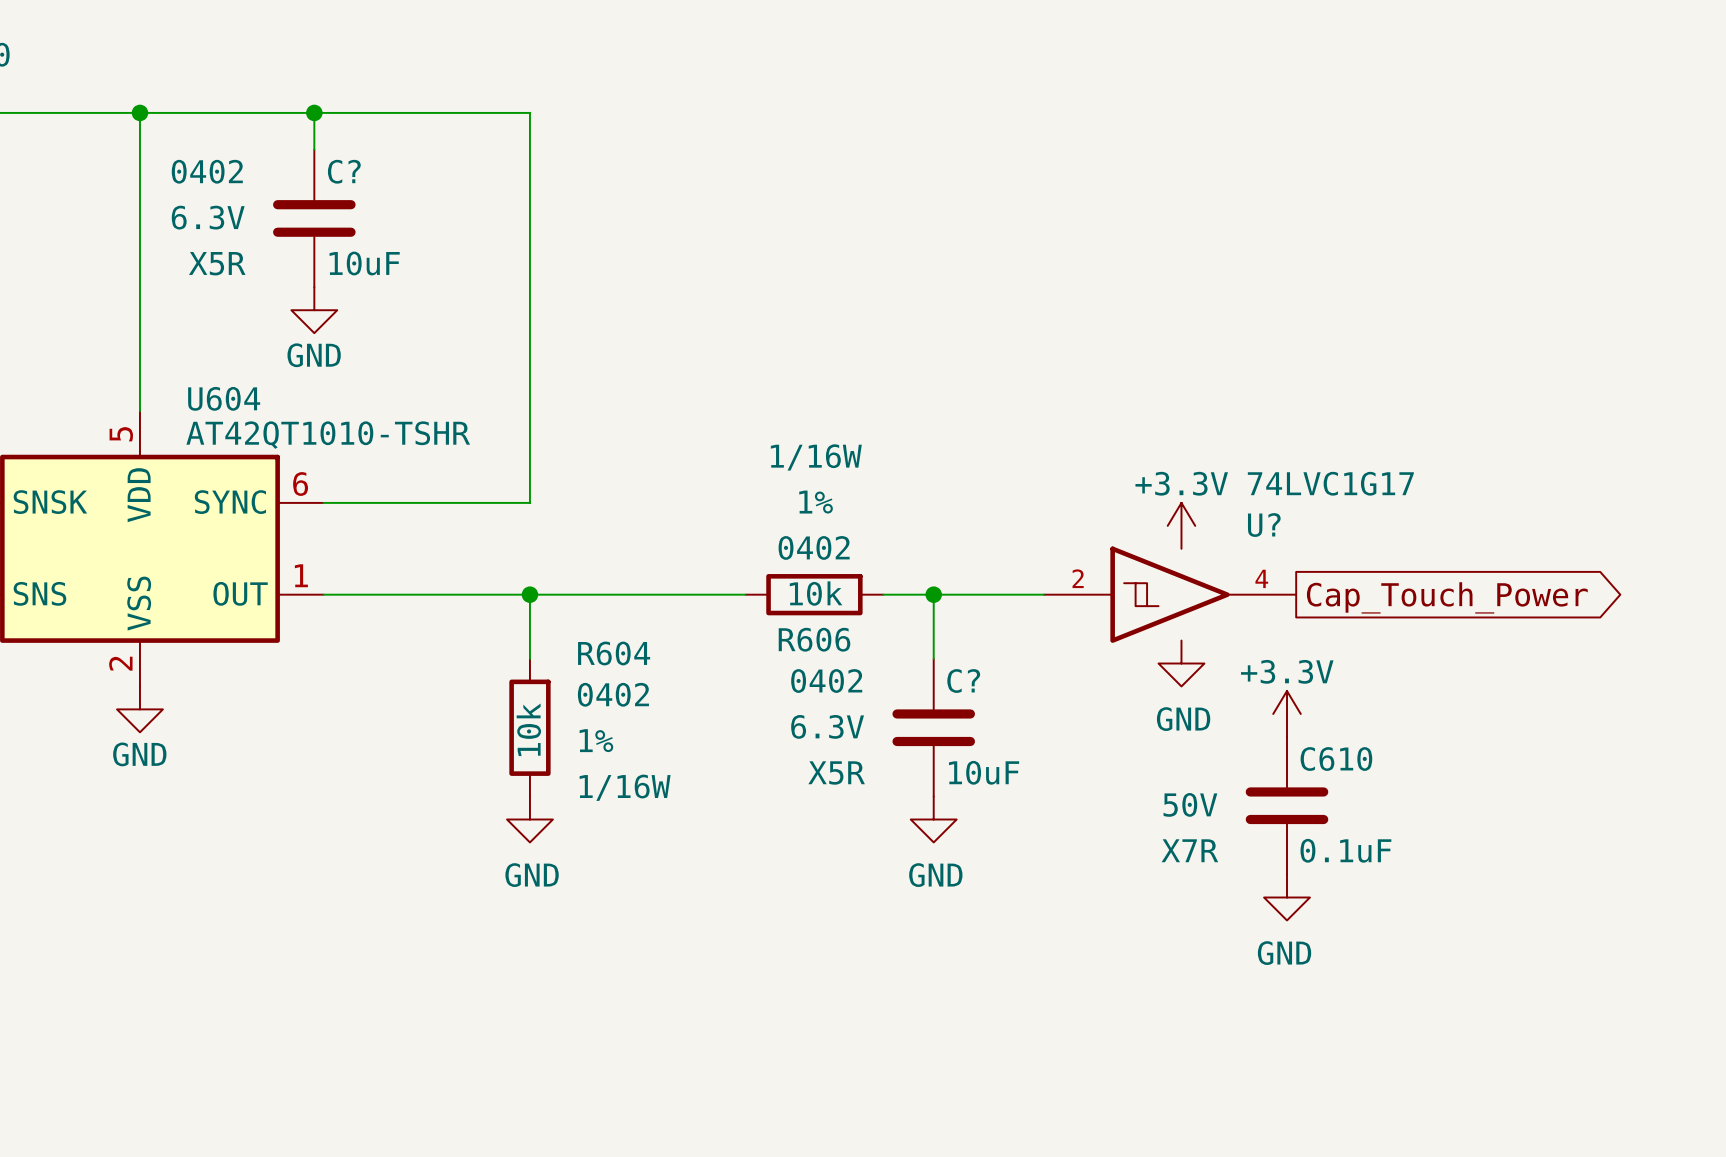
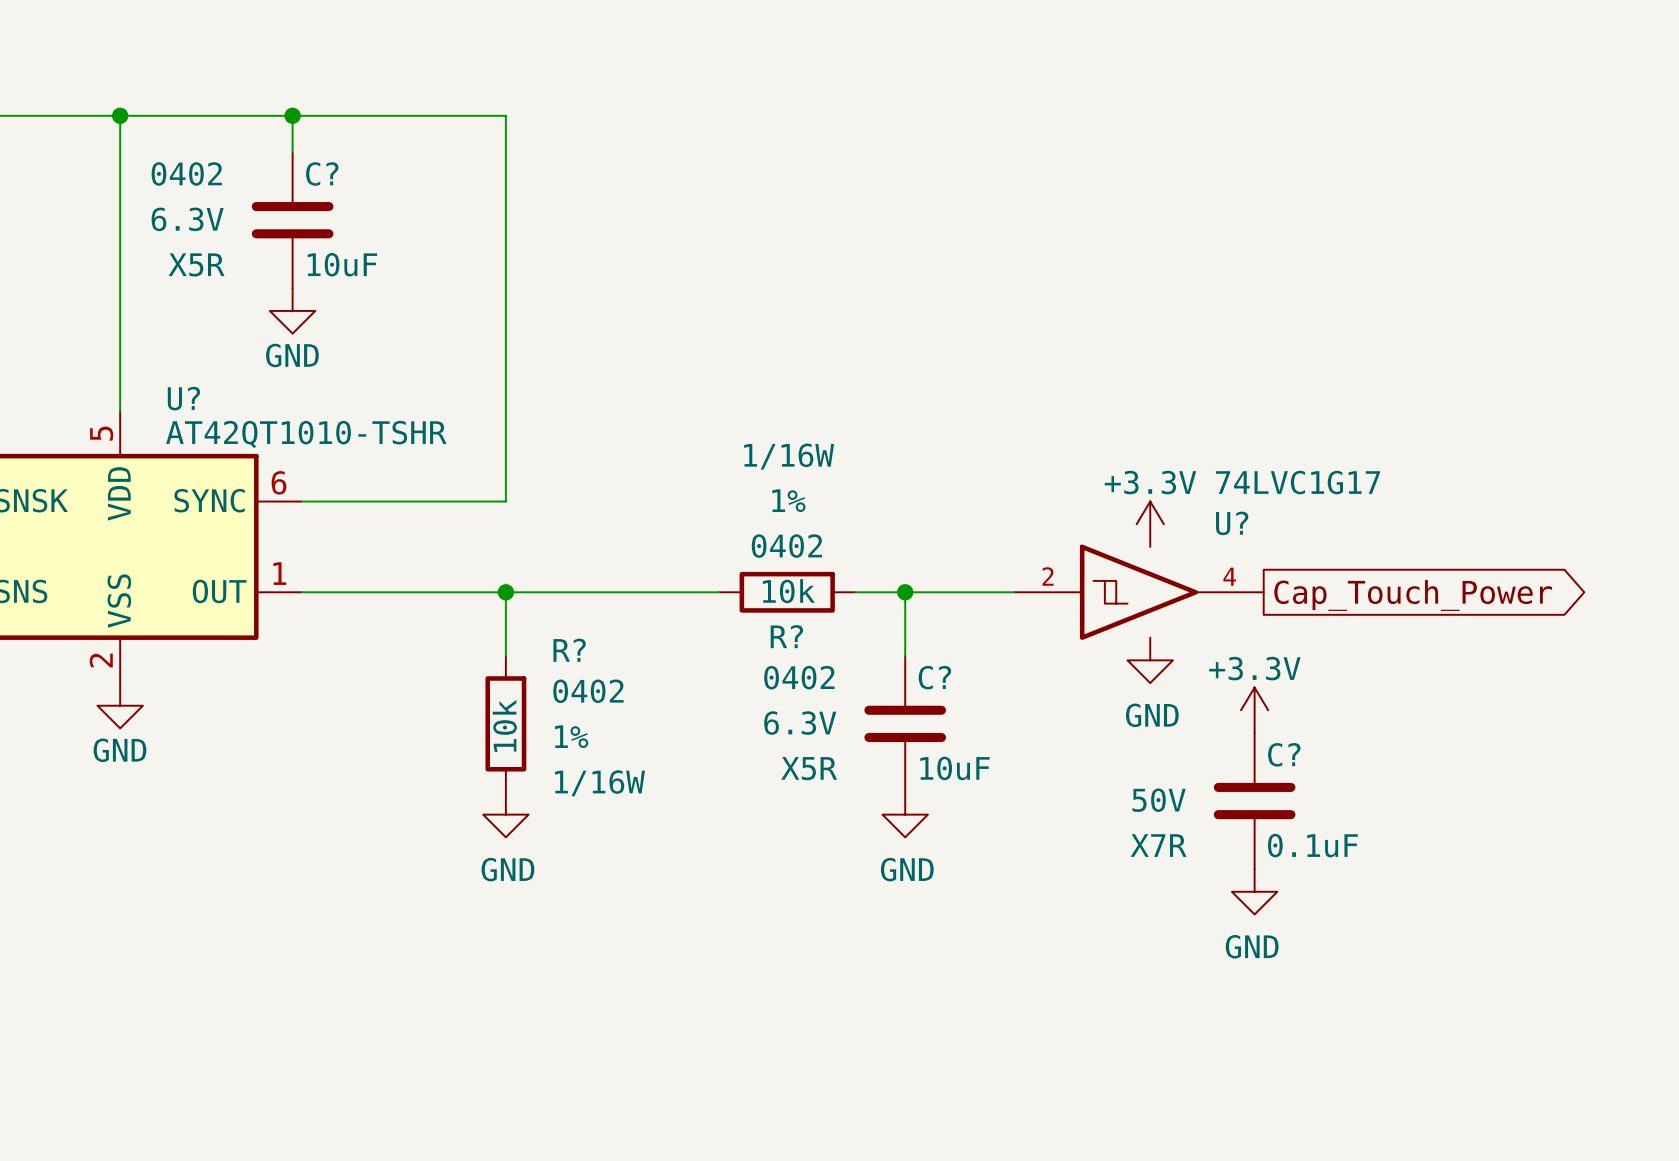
U604 name: U604 (224, 398) -> U? (183, 398)
R606 name: R606 (814, 639) -> R? (786, 636)
R604 name: R604 (614, 653) -> R? (569, 650)
C610 name: C610 (1336, 759) -> C? (1284, 754)

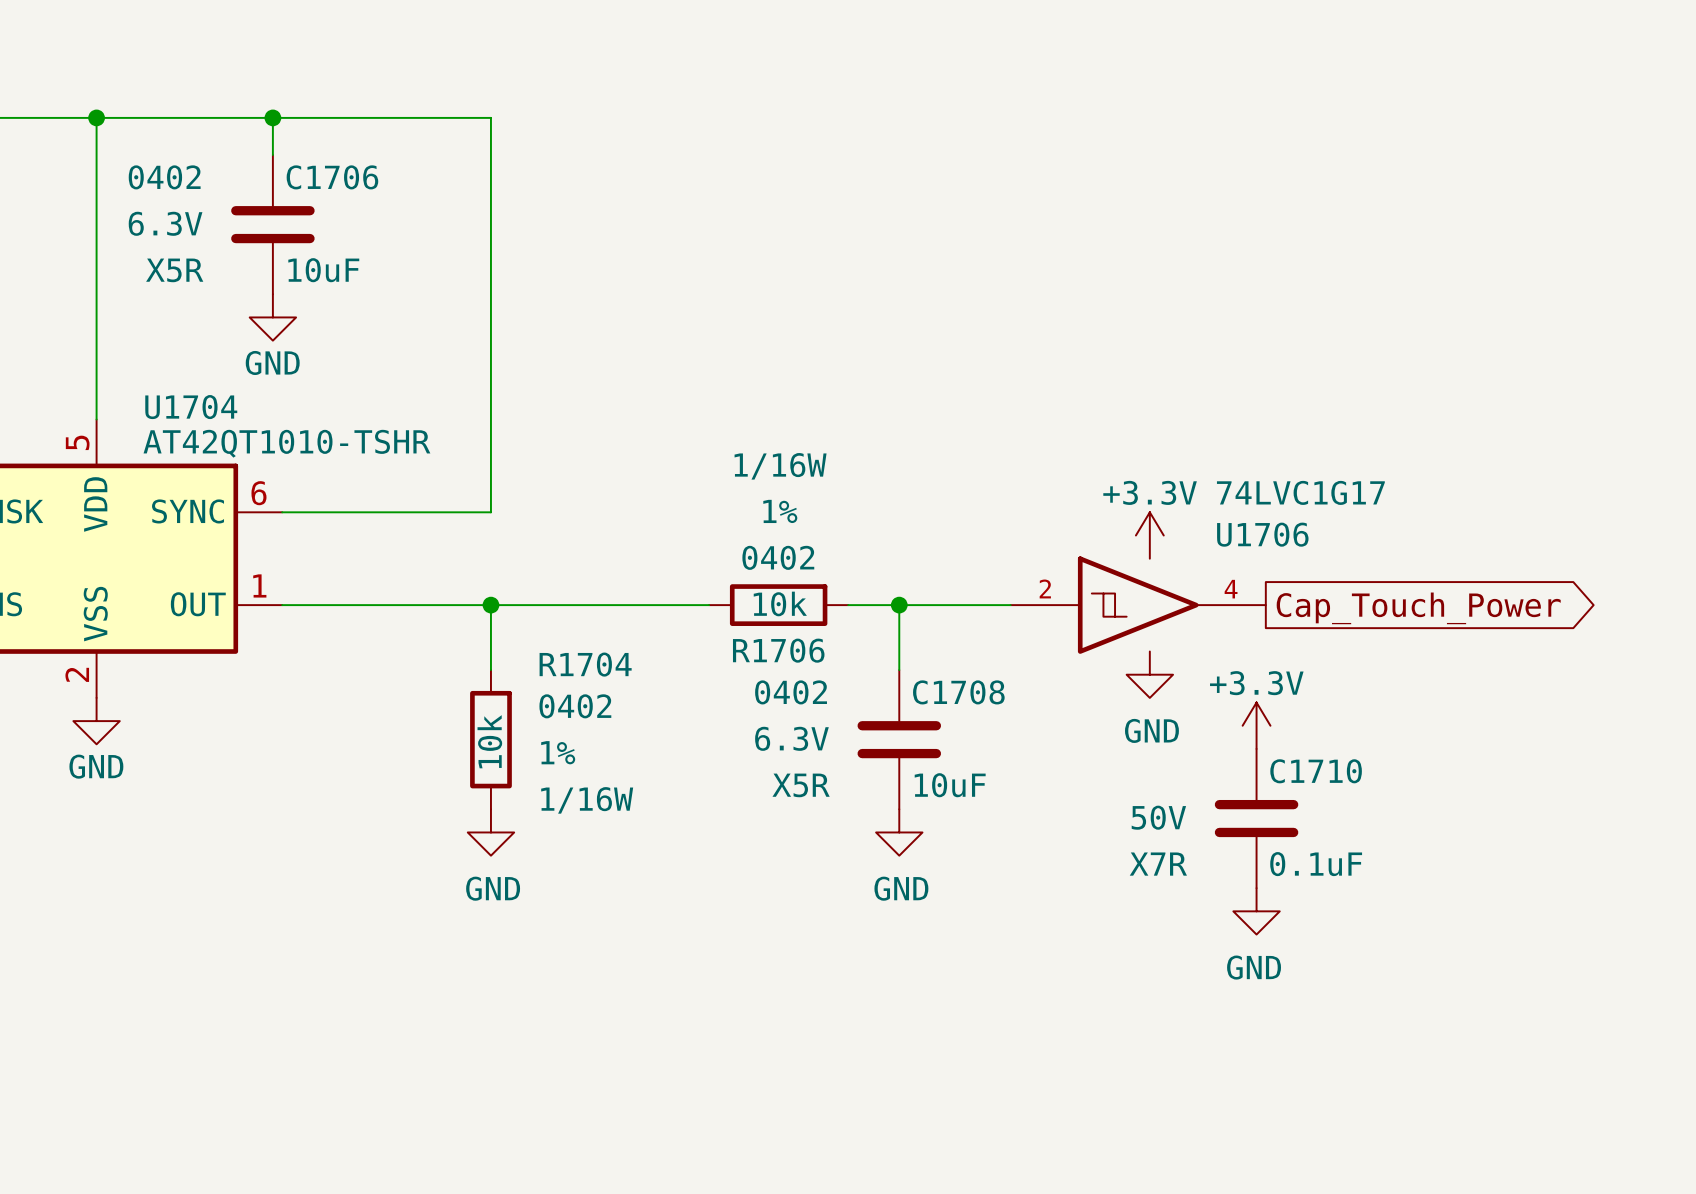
C? name: C? (322, 173) -> C1706 (332, 177)
U? name: U? (183, 398) -> U1704 (191, 407)
U? name: U? (1232, 523) -> U1706 (1262, 534)
R? name: R? (786, 636) -> R1706 (778, 650)
R? name: R? (569, 650) -> R1704 (585, 664)
C? name: C? (934, 677) -> C1708 (958, 692)
C? name: C? (1284, 754) -> C1710 (1316, 771)

